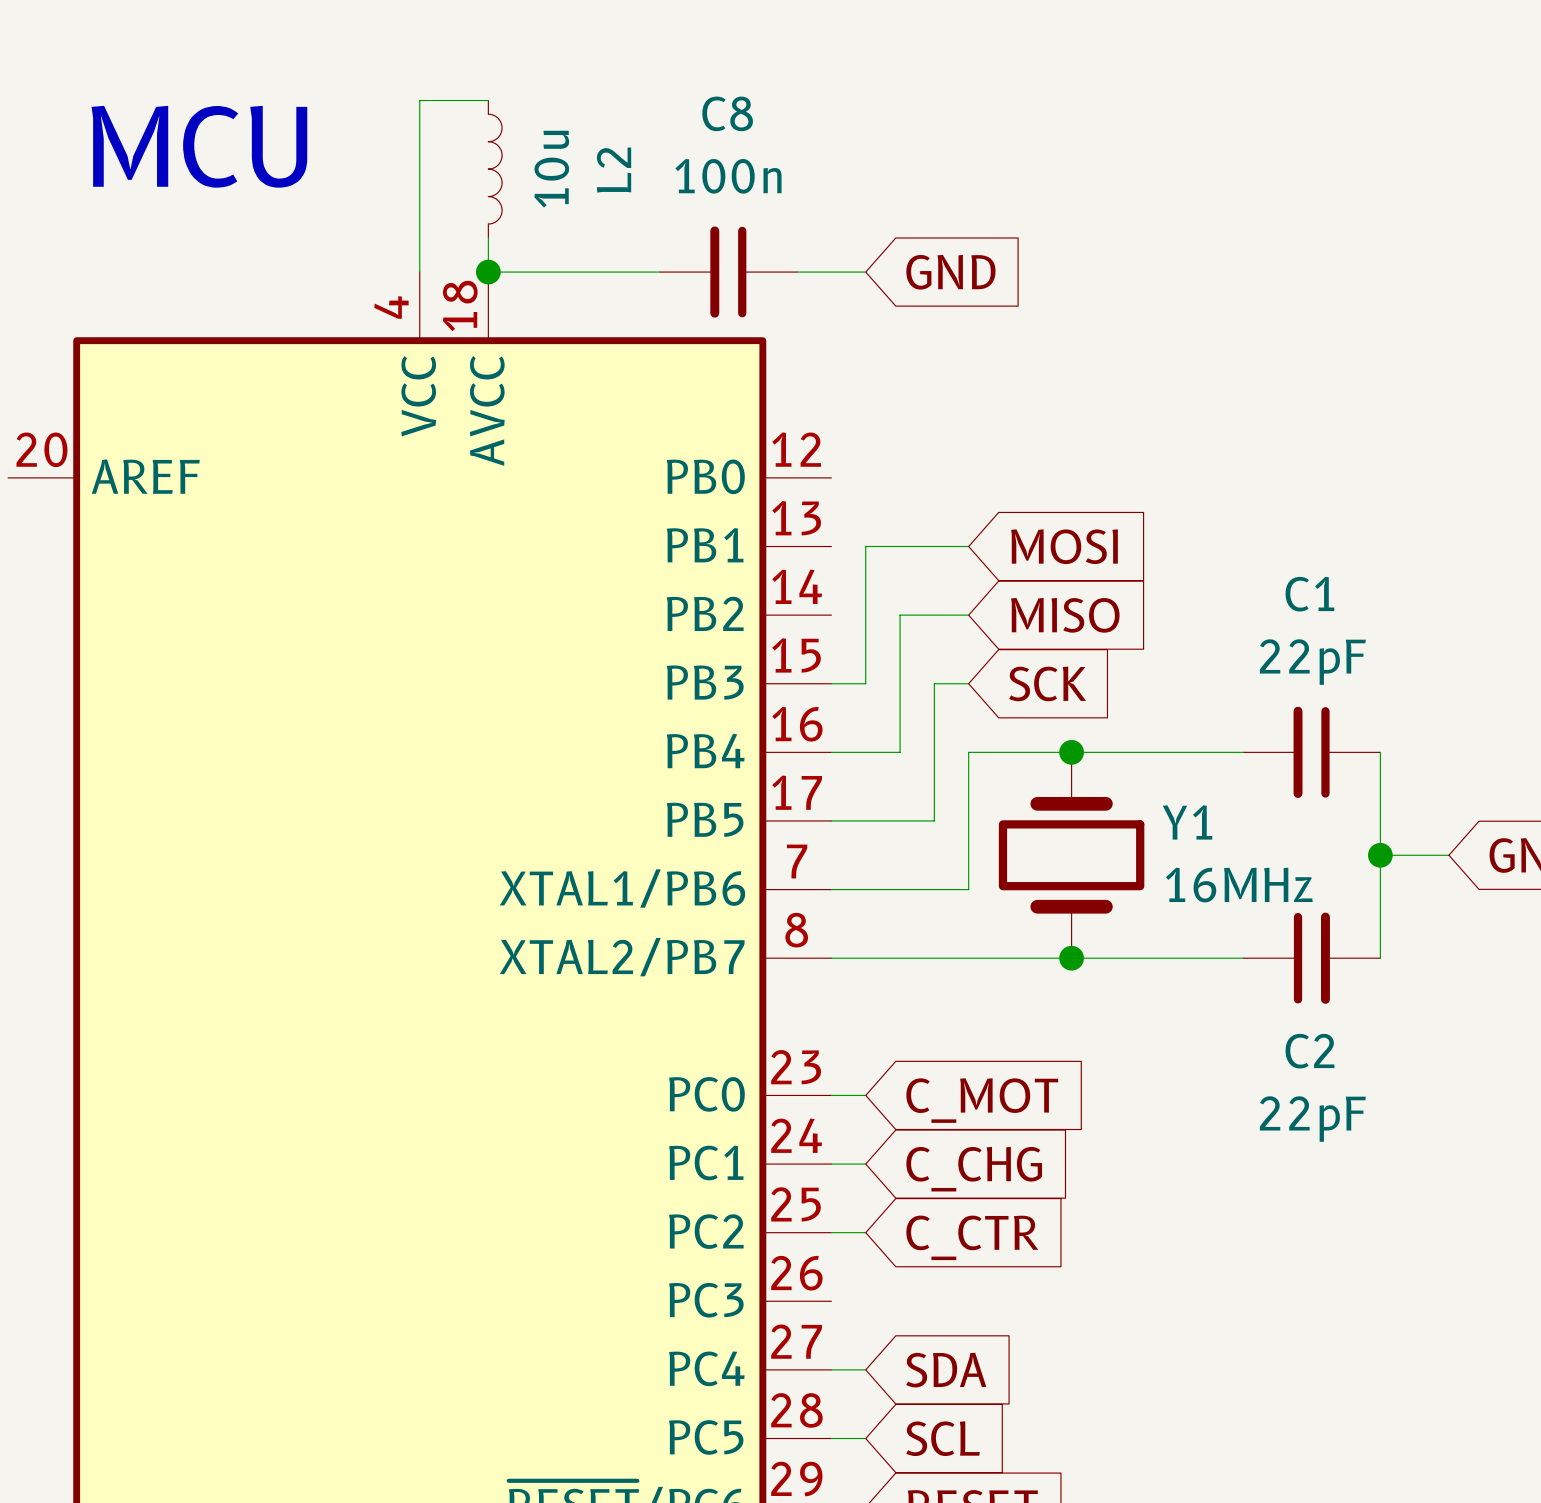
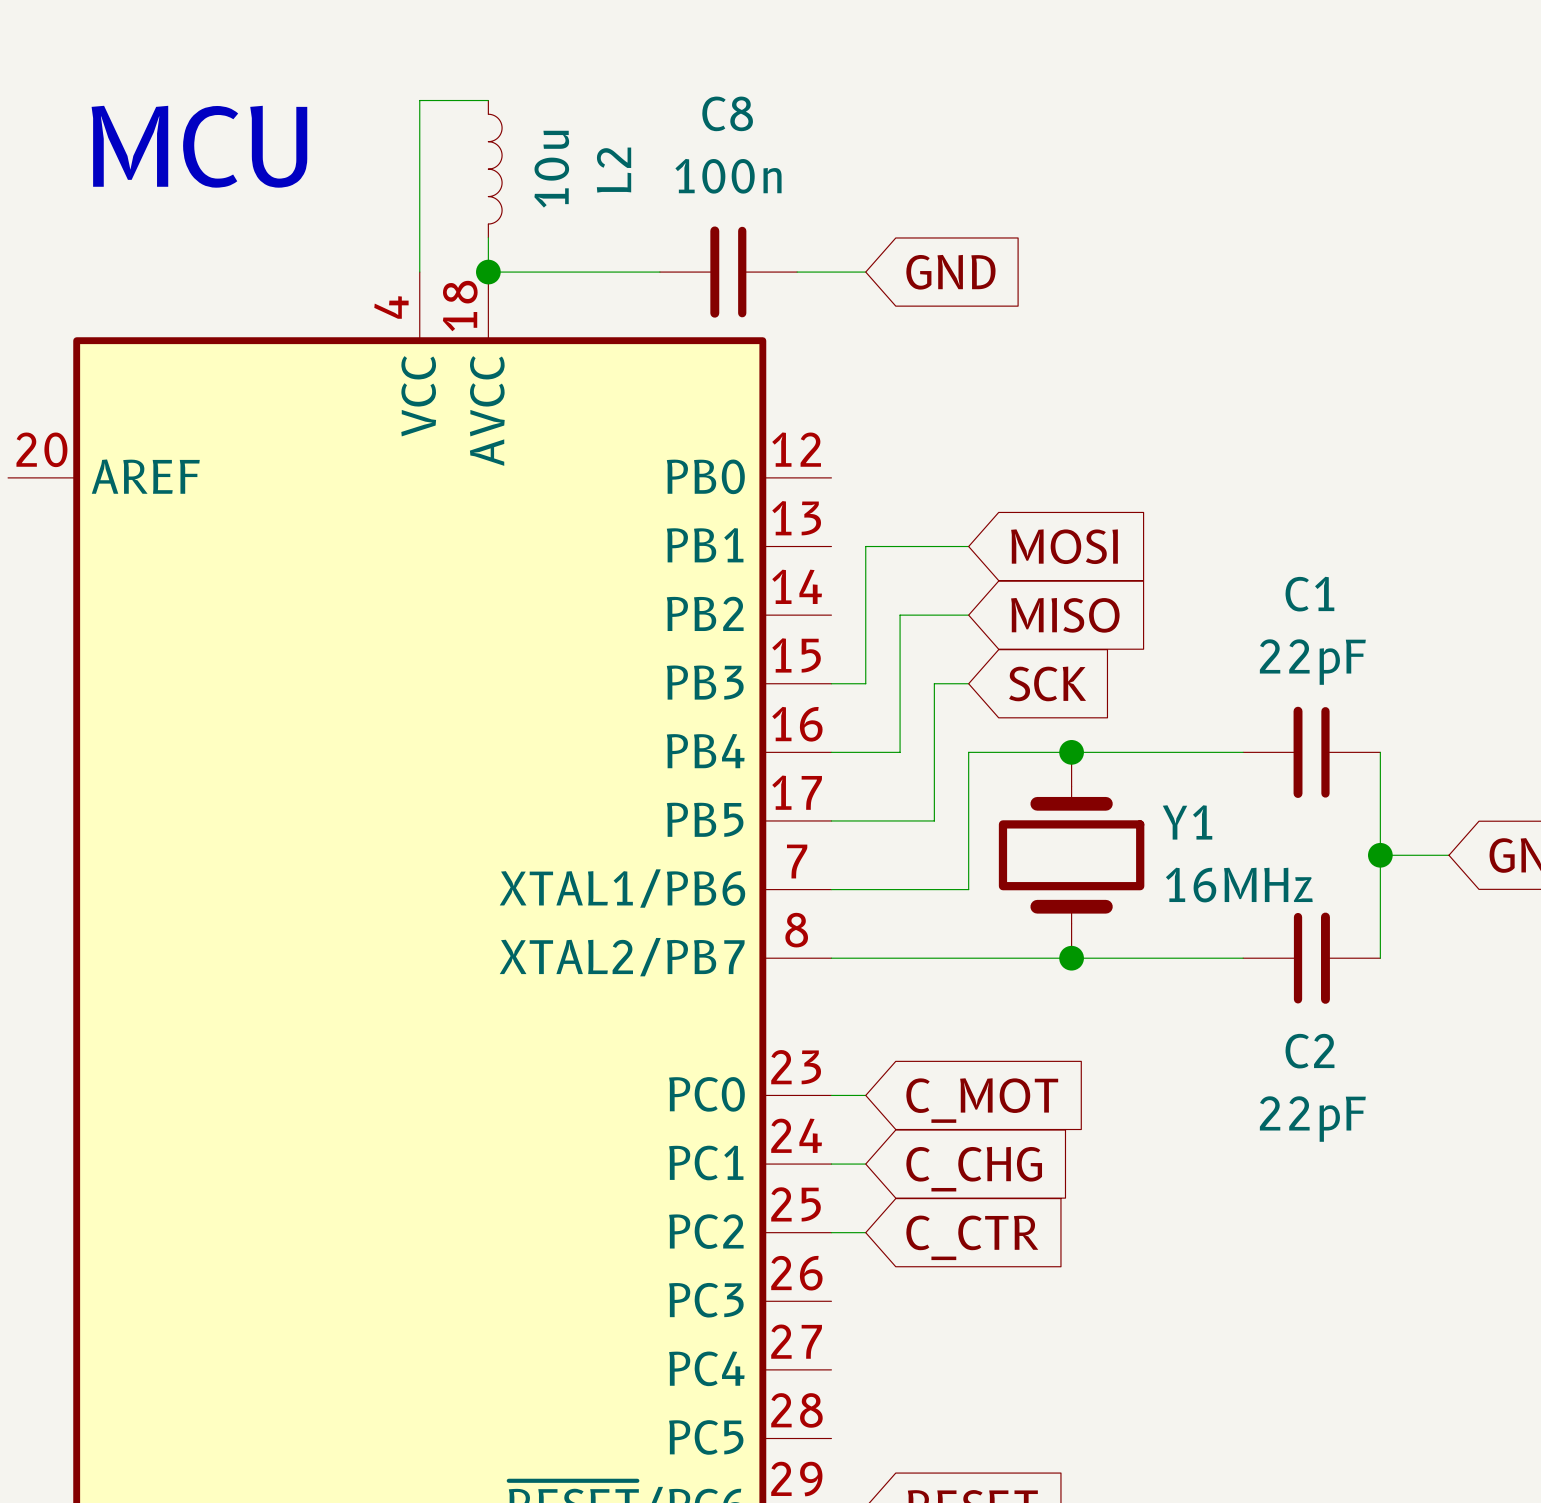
wire: (831, 1369) (865, 1369) -> none
global label: SDA (946, 1370) -> none
wire: (831, 1438) (865, 1438) -> none
global label: SCL (942, 1438) -> none

